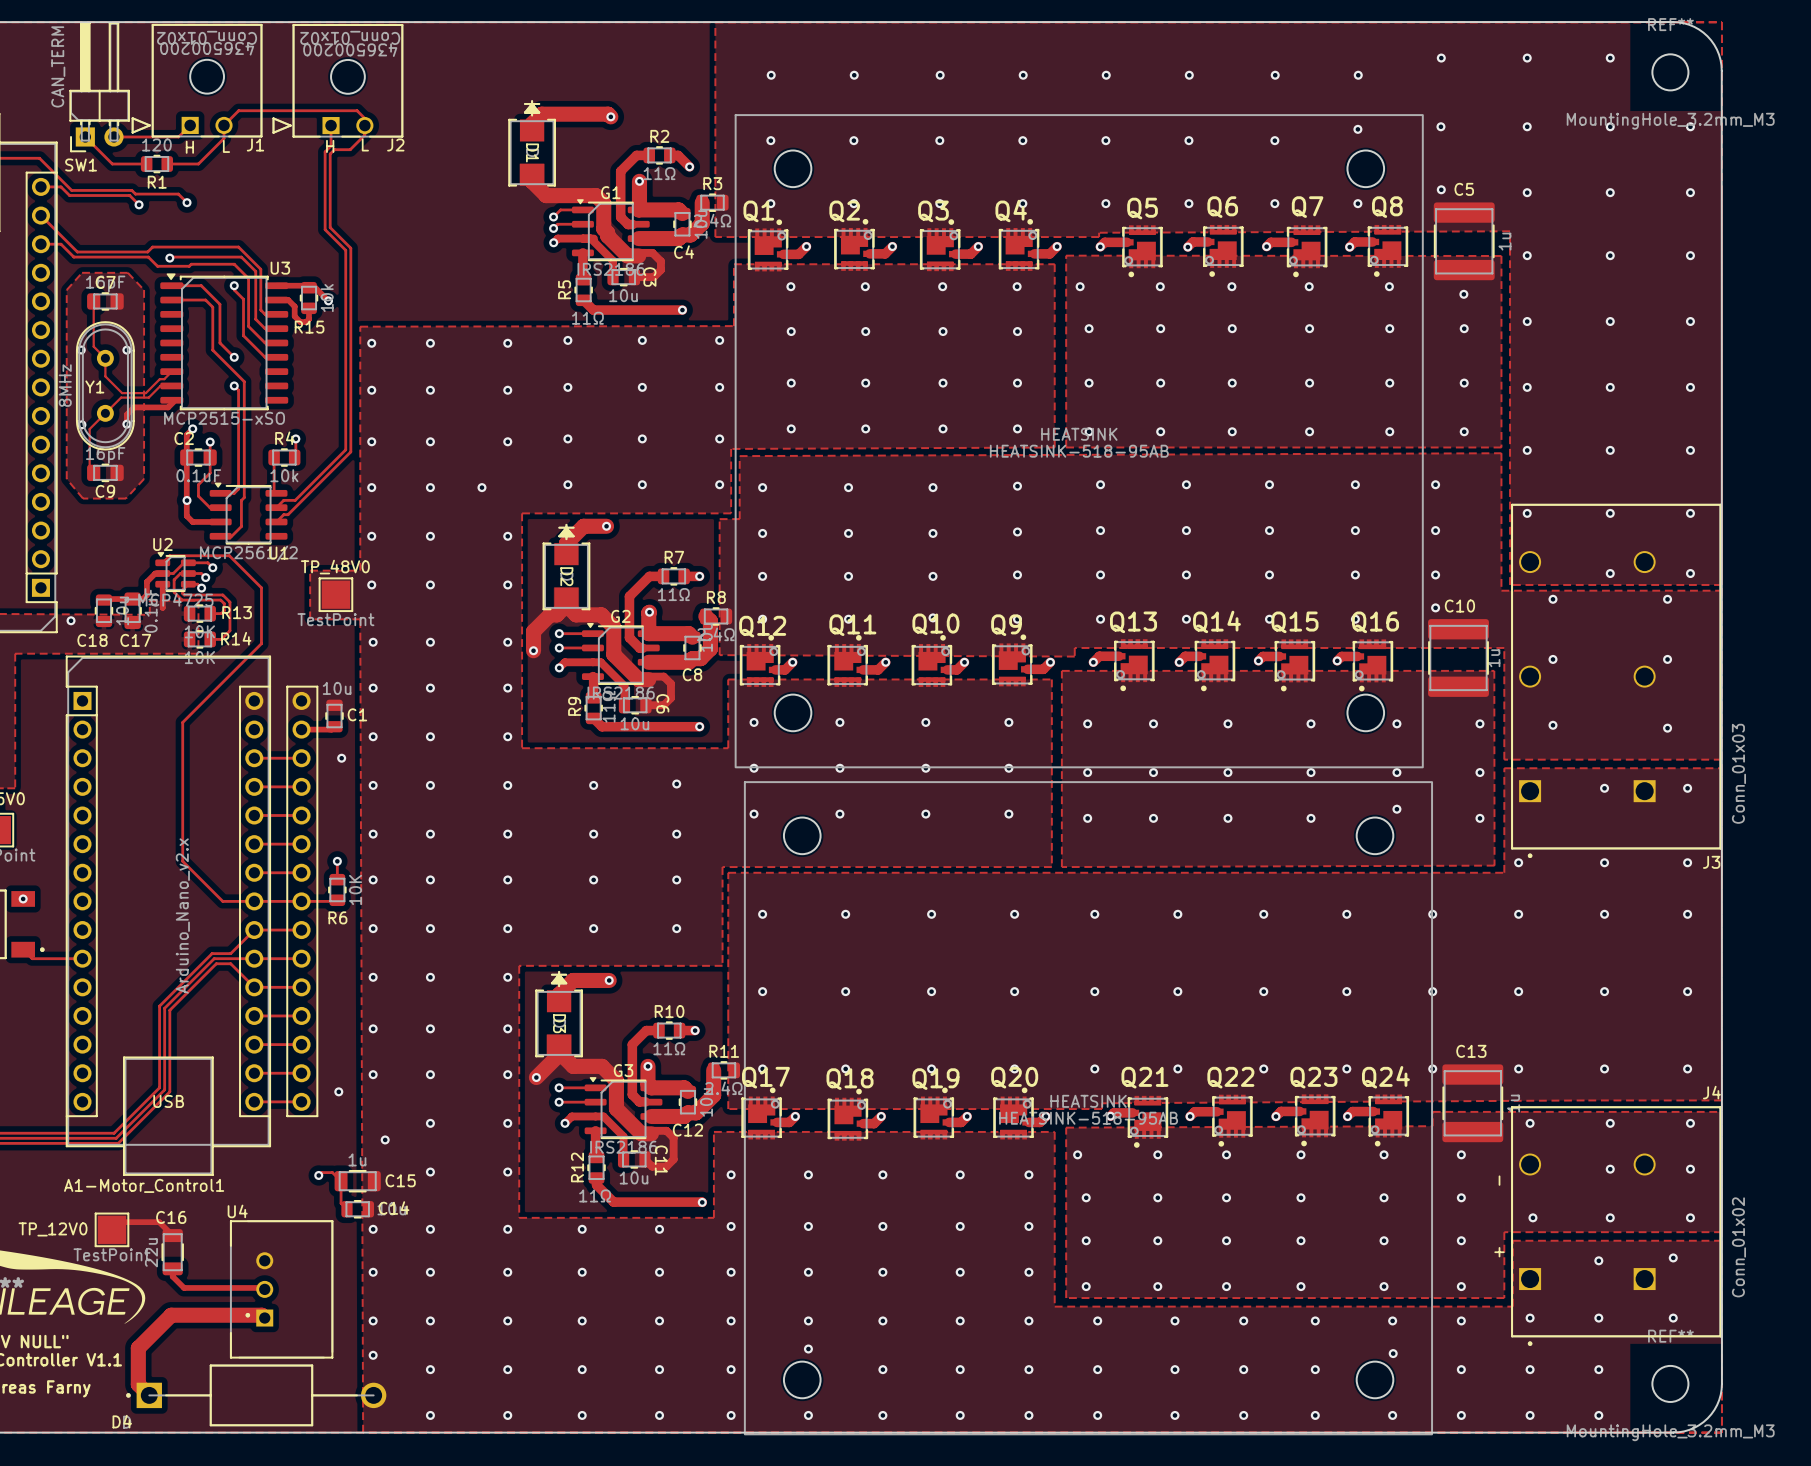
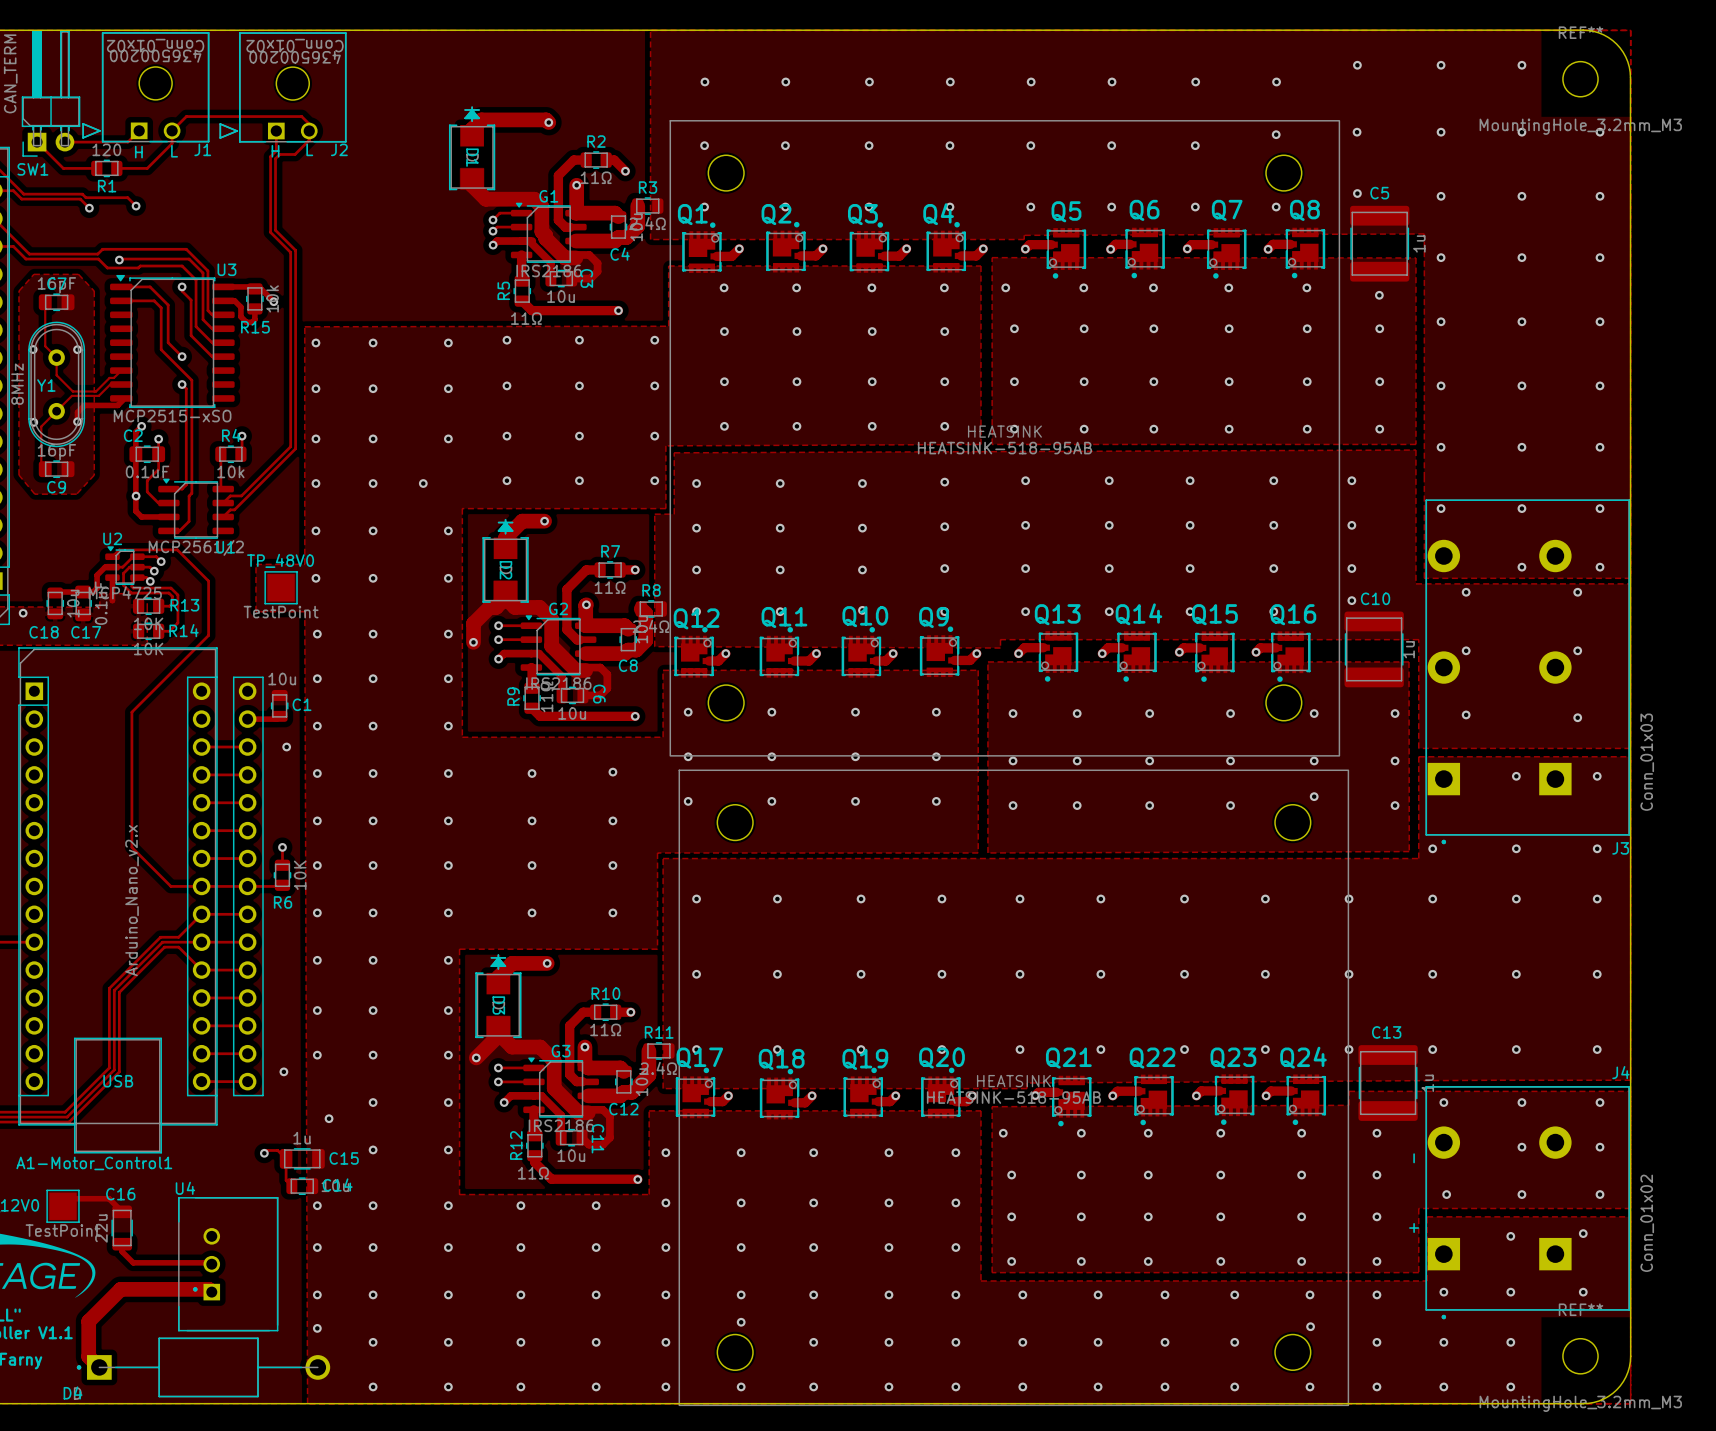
J3 footprint: [1511, 504, 1722, 859] -> [1425, 499, 1631, 845]
J4 footprint: [1511, 1106, 1722, 1346] -> [1425, 1086, 1631, 1320]

